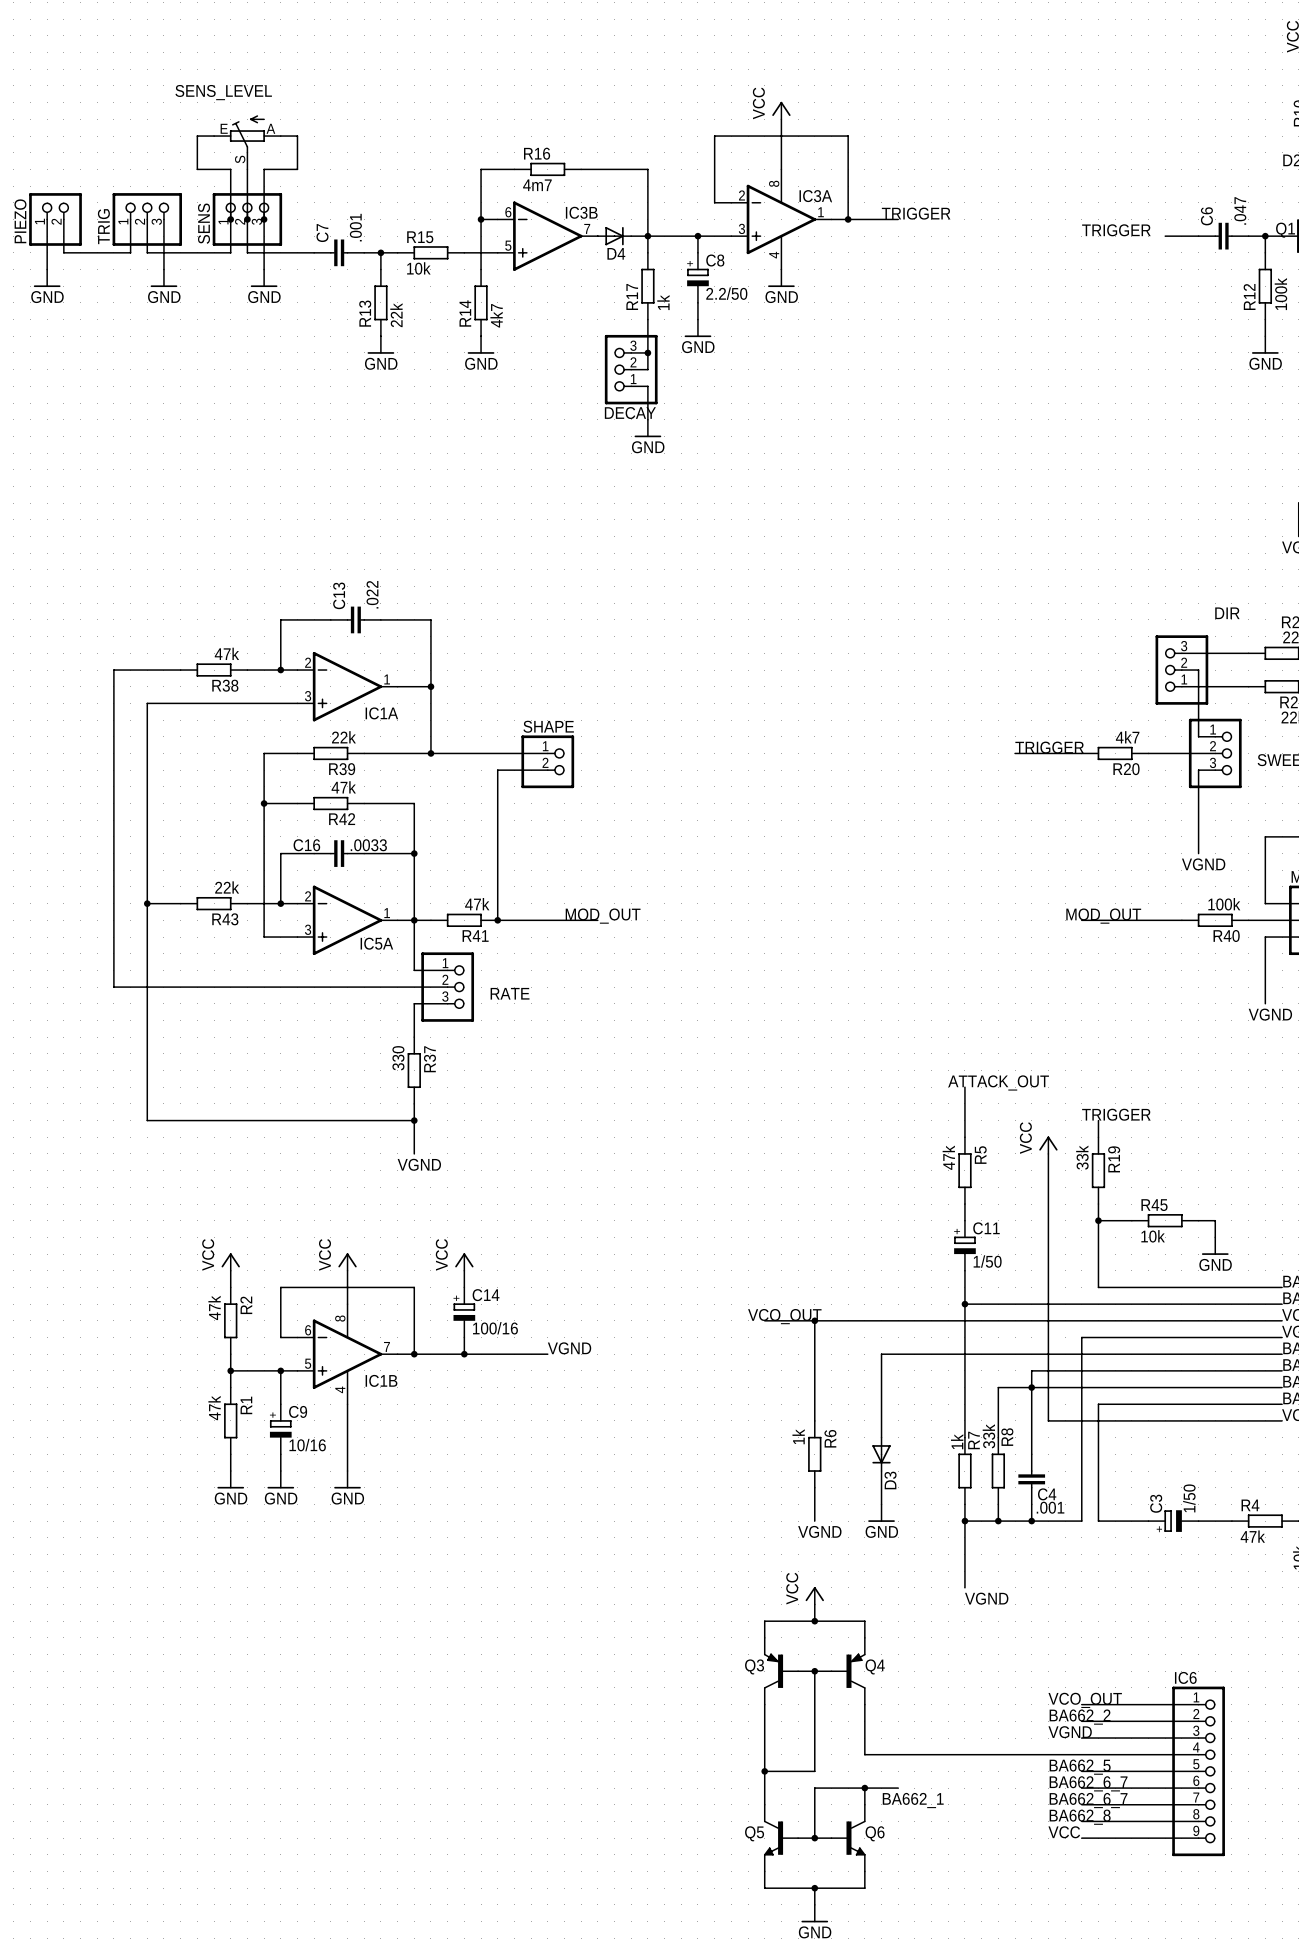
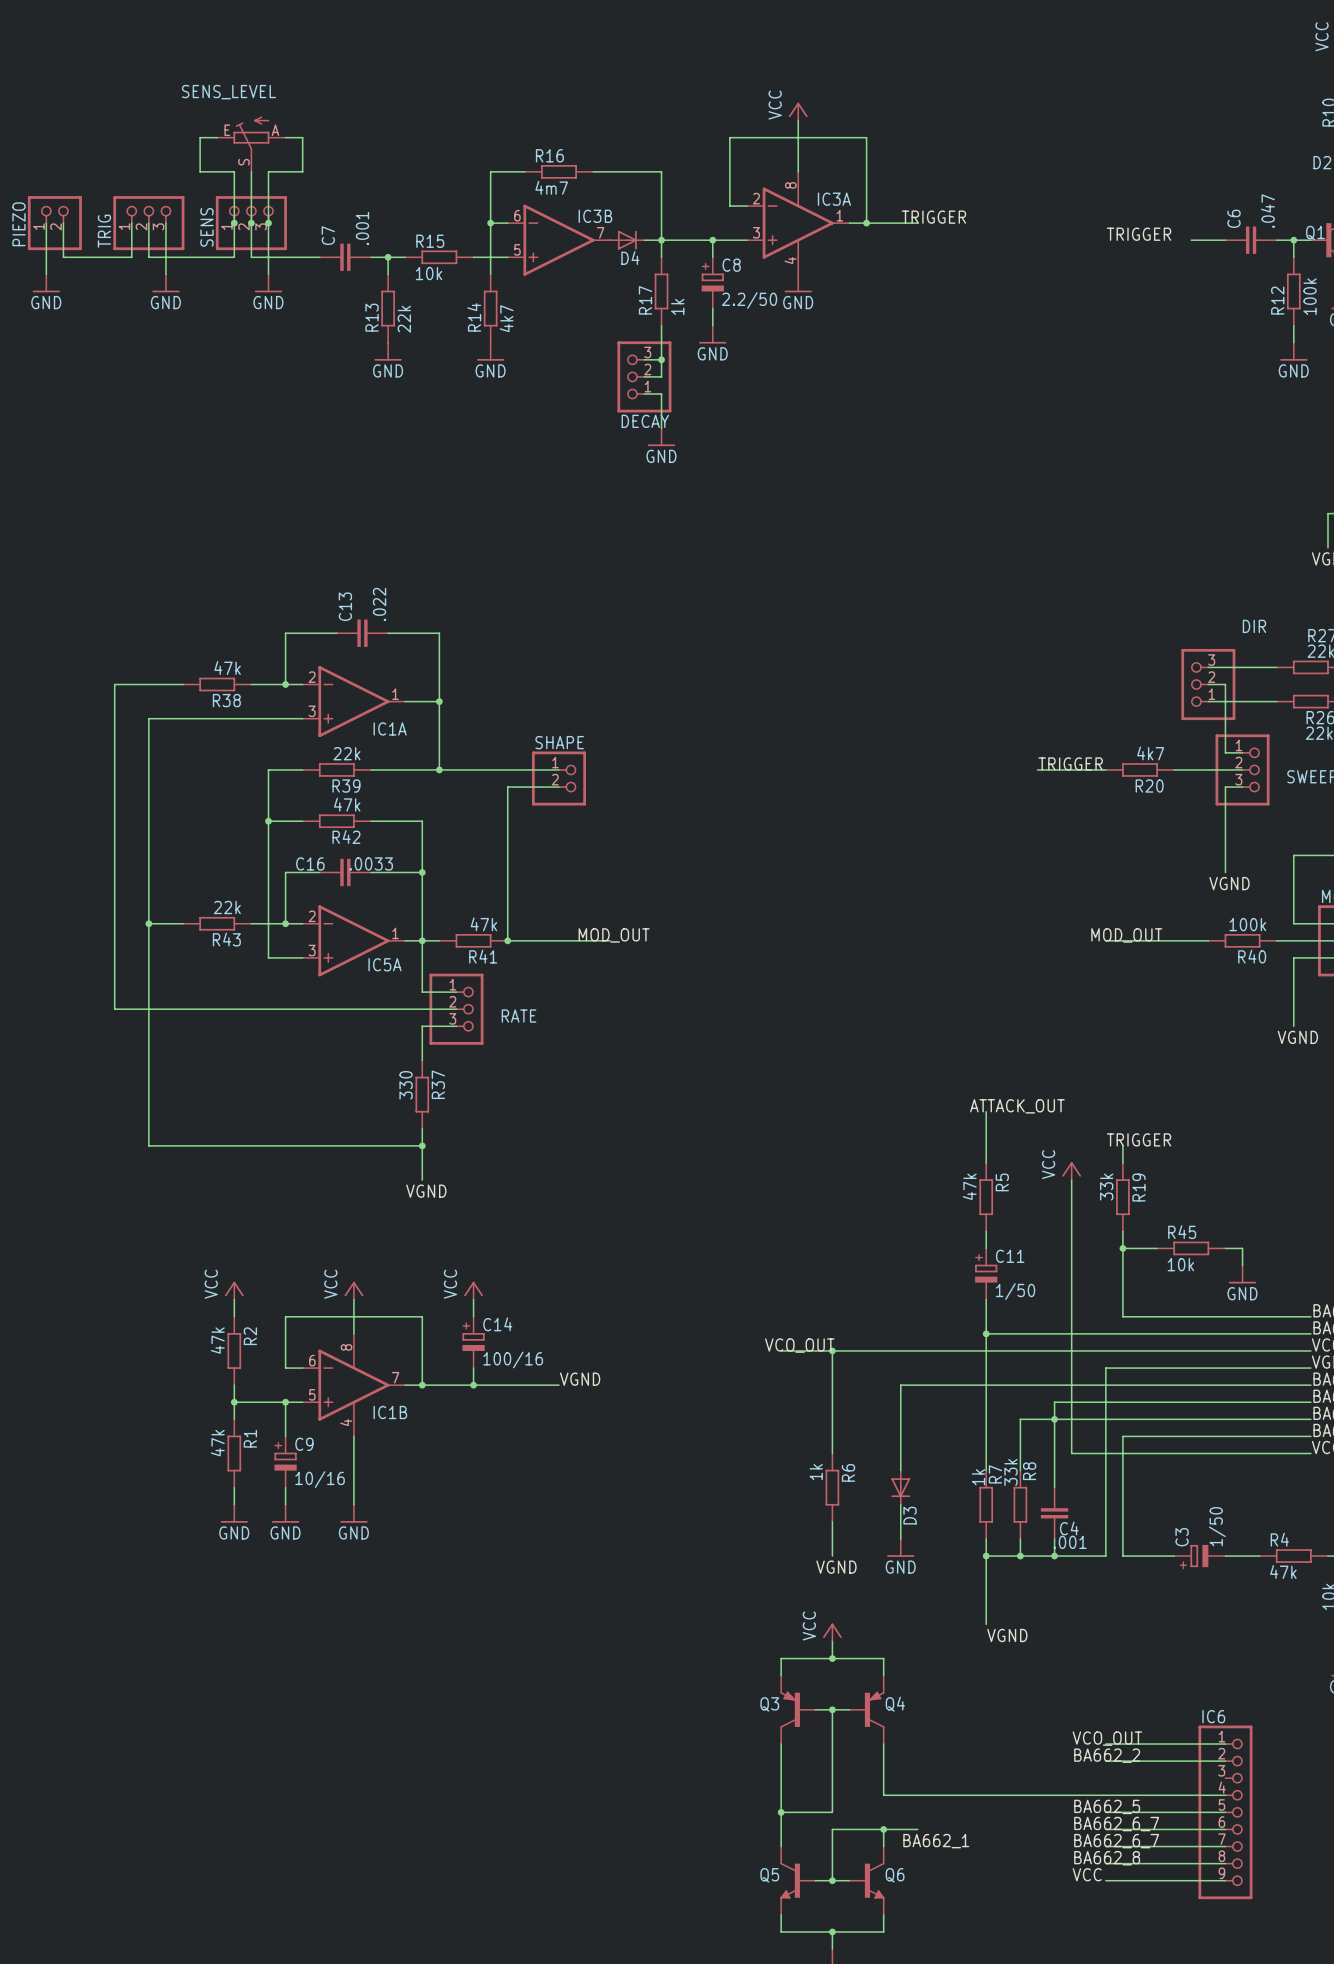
label: VGND (1070, 1732) -> none
wire: (1081, 1738) (1198, 1738) -> none

